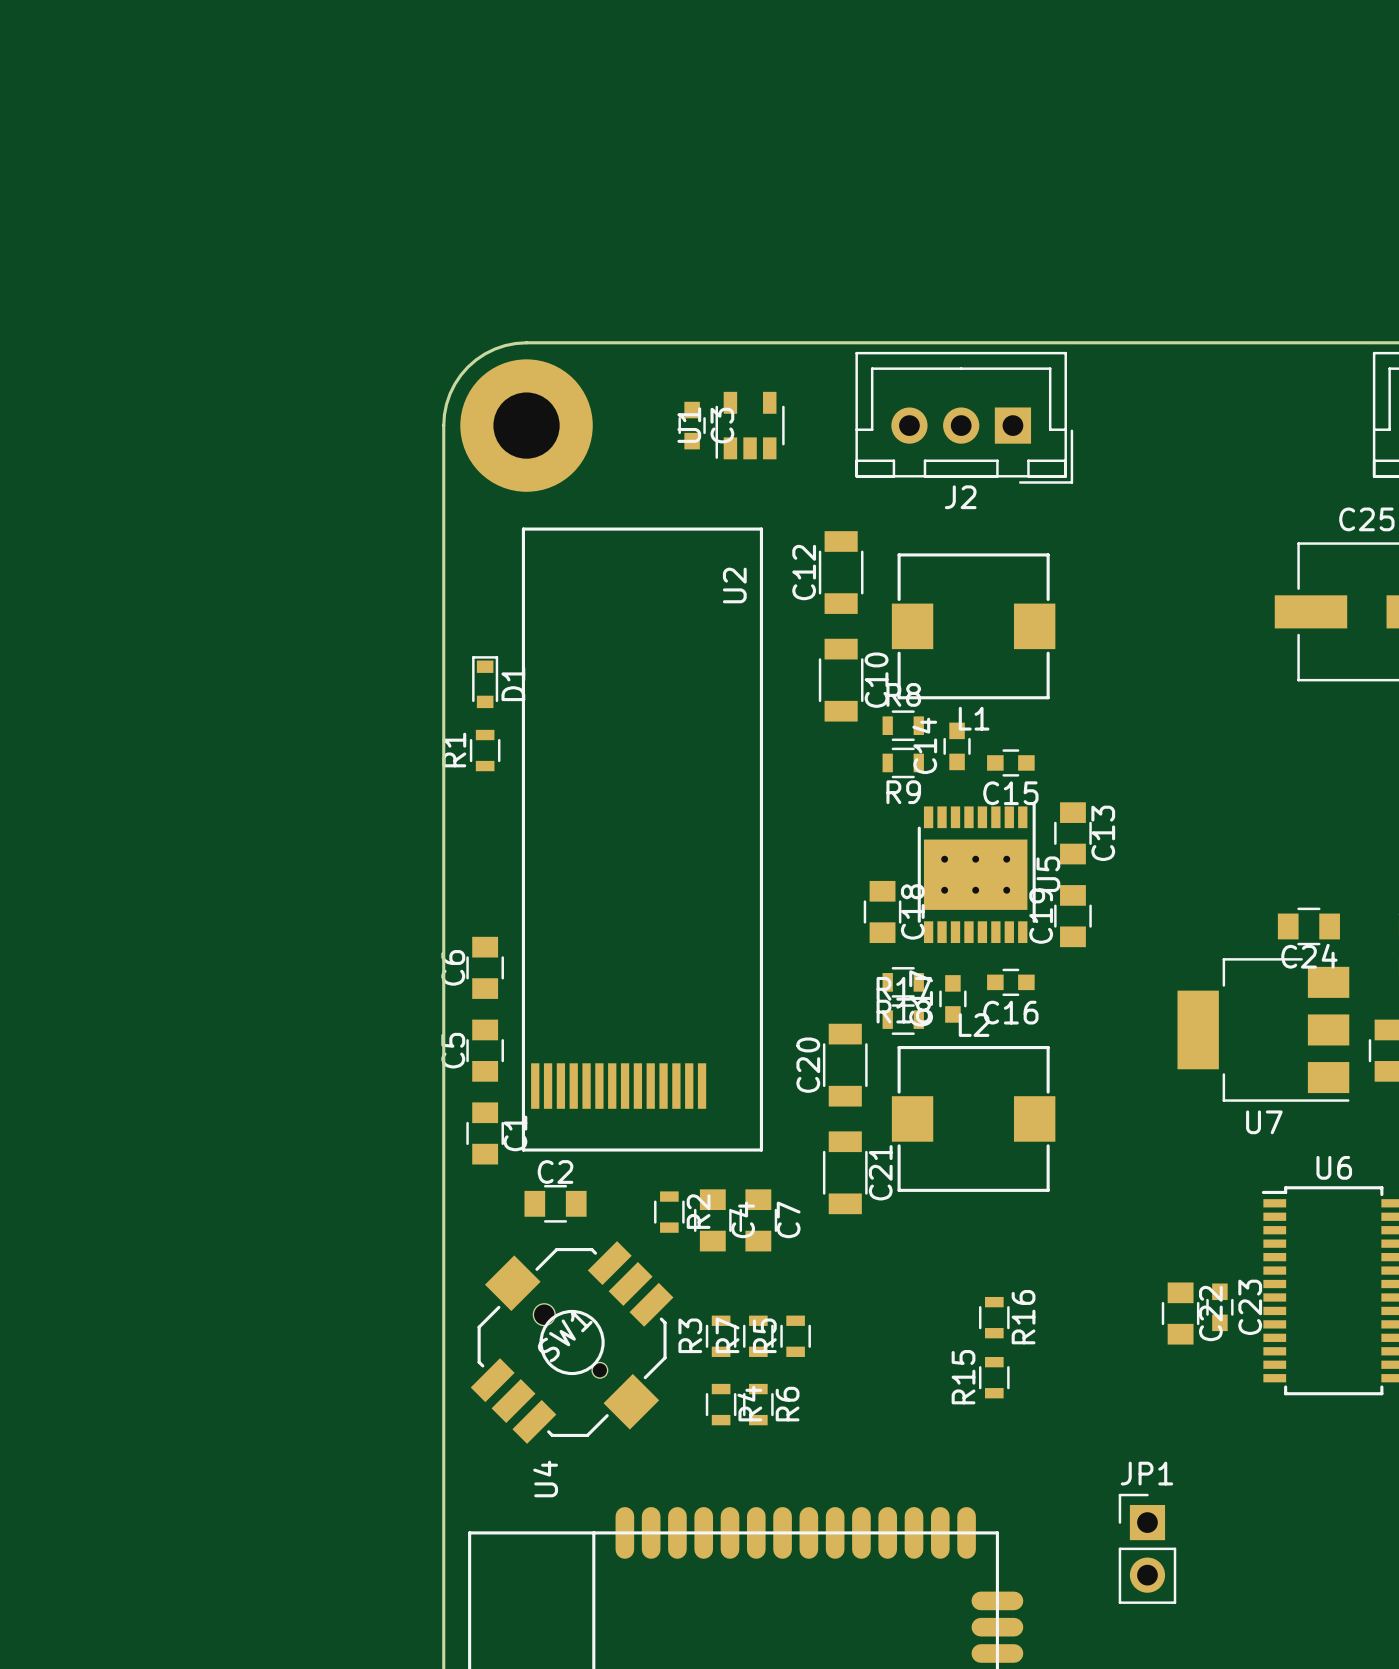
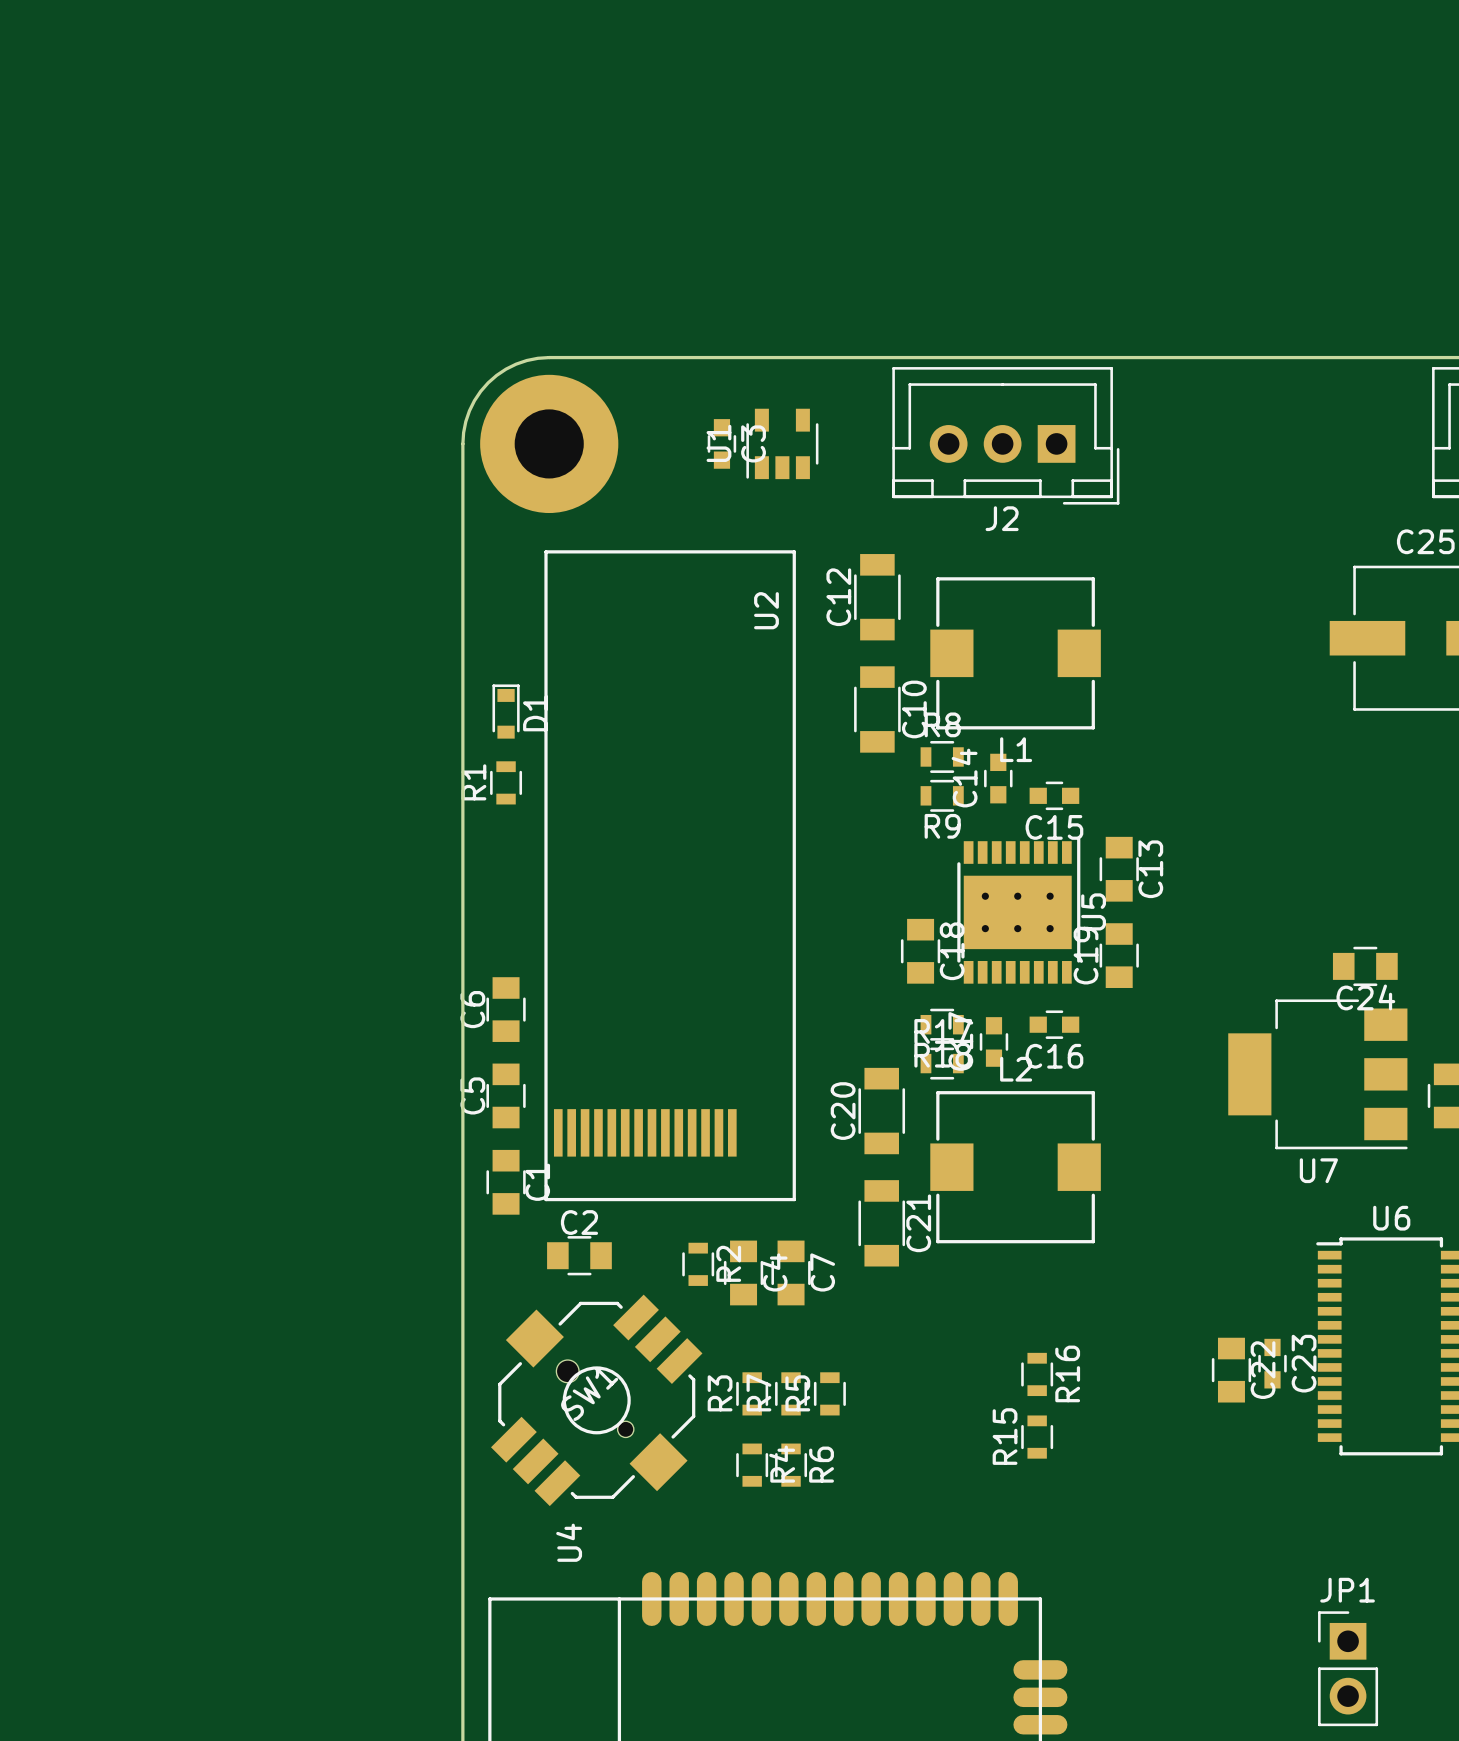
JP1 position: (1147, 1548) -> (1348, 1668)

